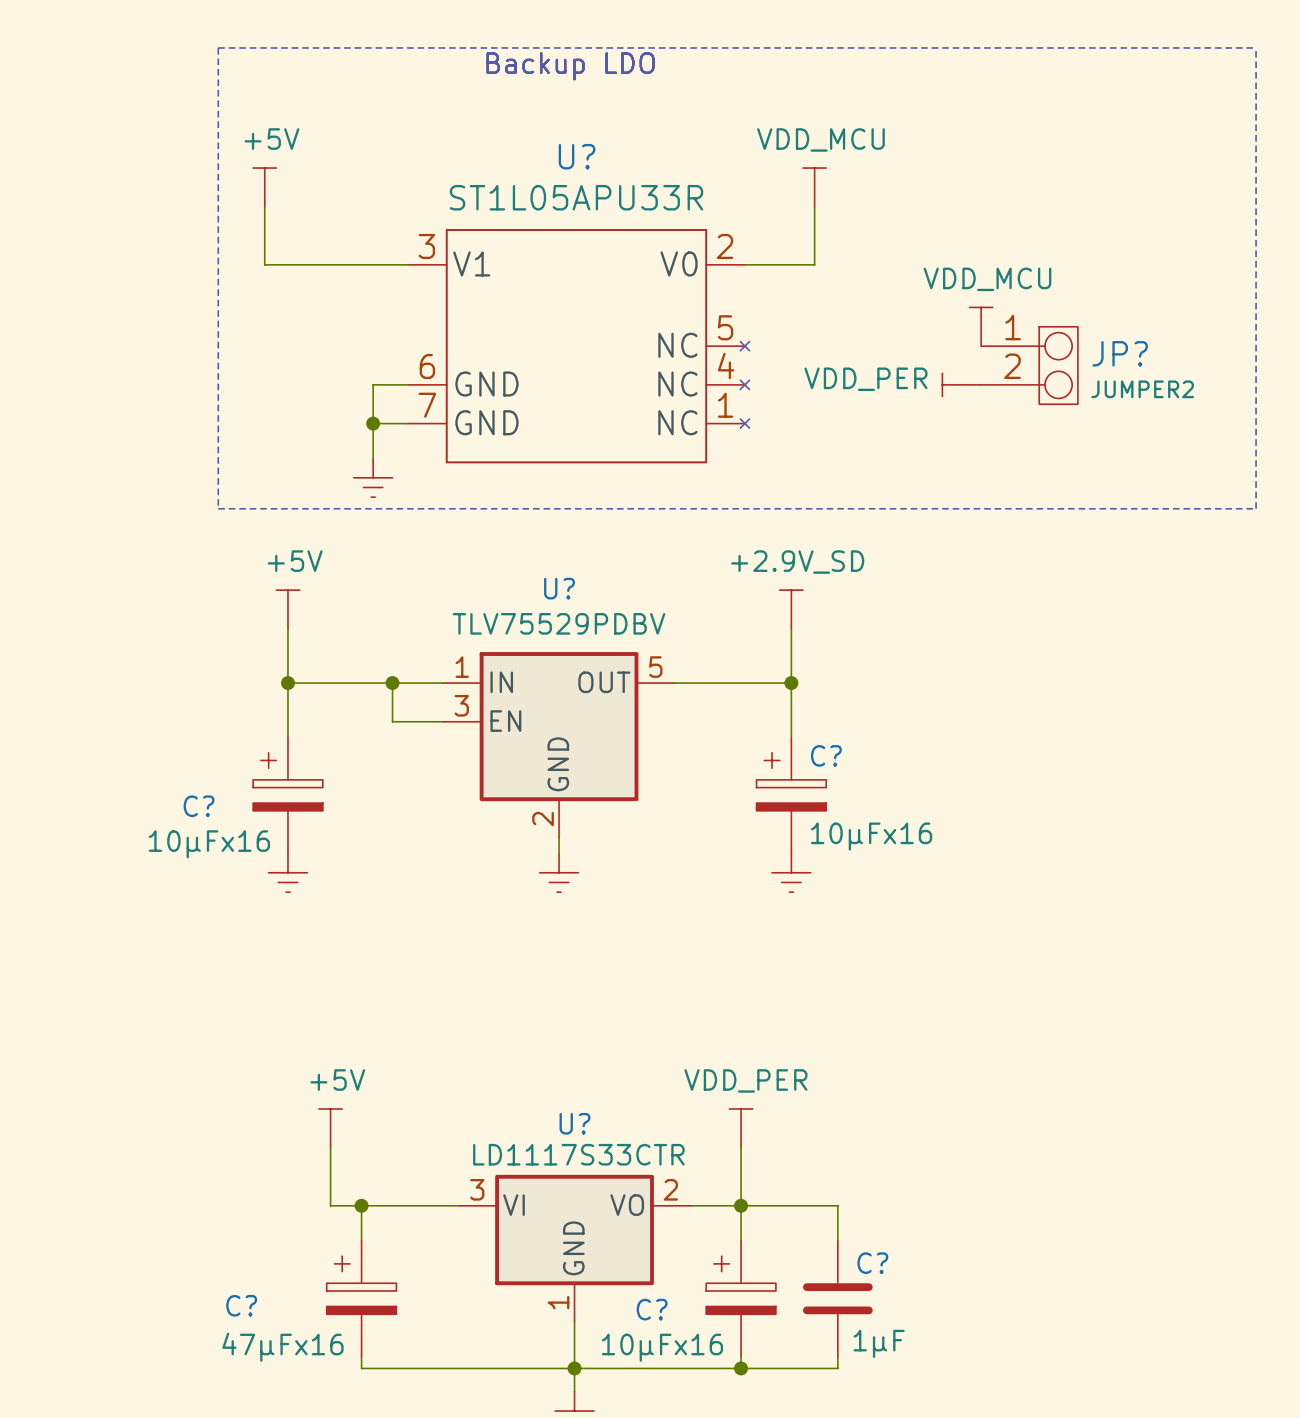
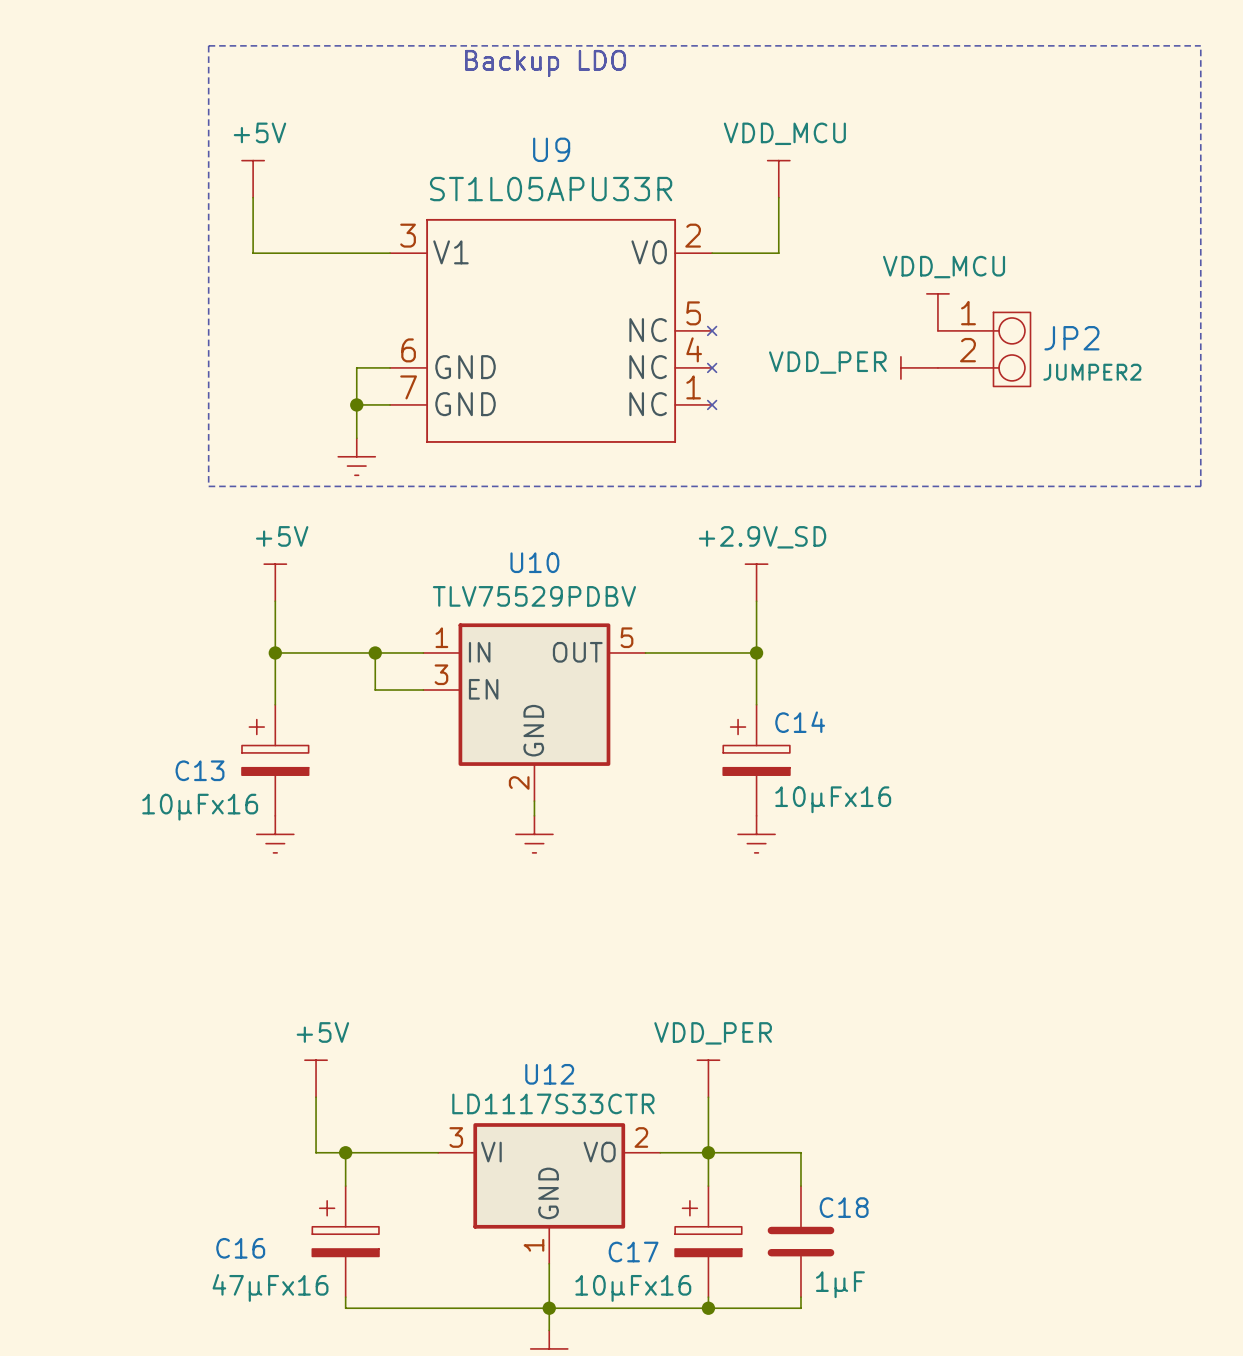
U? name: U? (577, 156) -> U9 (551, 149)
JP? name: JP? (1120, 353) -> JP2 (1071, 338)
U? name: U? (559, 588) -> U10 (534, 562)
C? name: C? (826, 755) -> C14 (800, 722)
C? name: C? (199, 806) -> C13 (200, 770)
U? name: U? (574, 1123) -> U12 (549, 1074)
C? name: C? (872, 1263) -> C18 (844, 1207)
C? name: C? (241, 1305) -> C16 (240, 1248)
C? name: C? (652, 1309) -> C17 (633, 1252)

